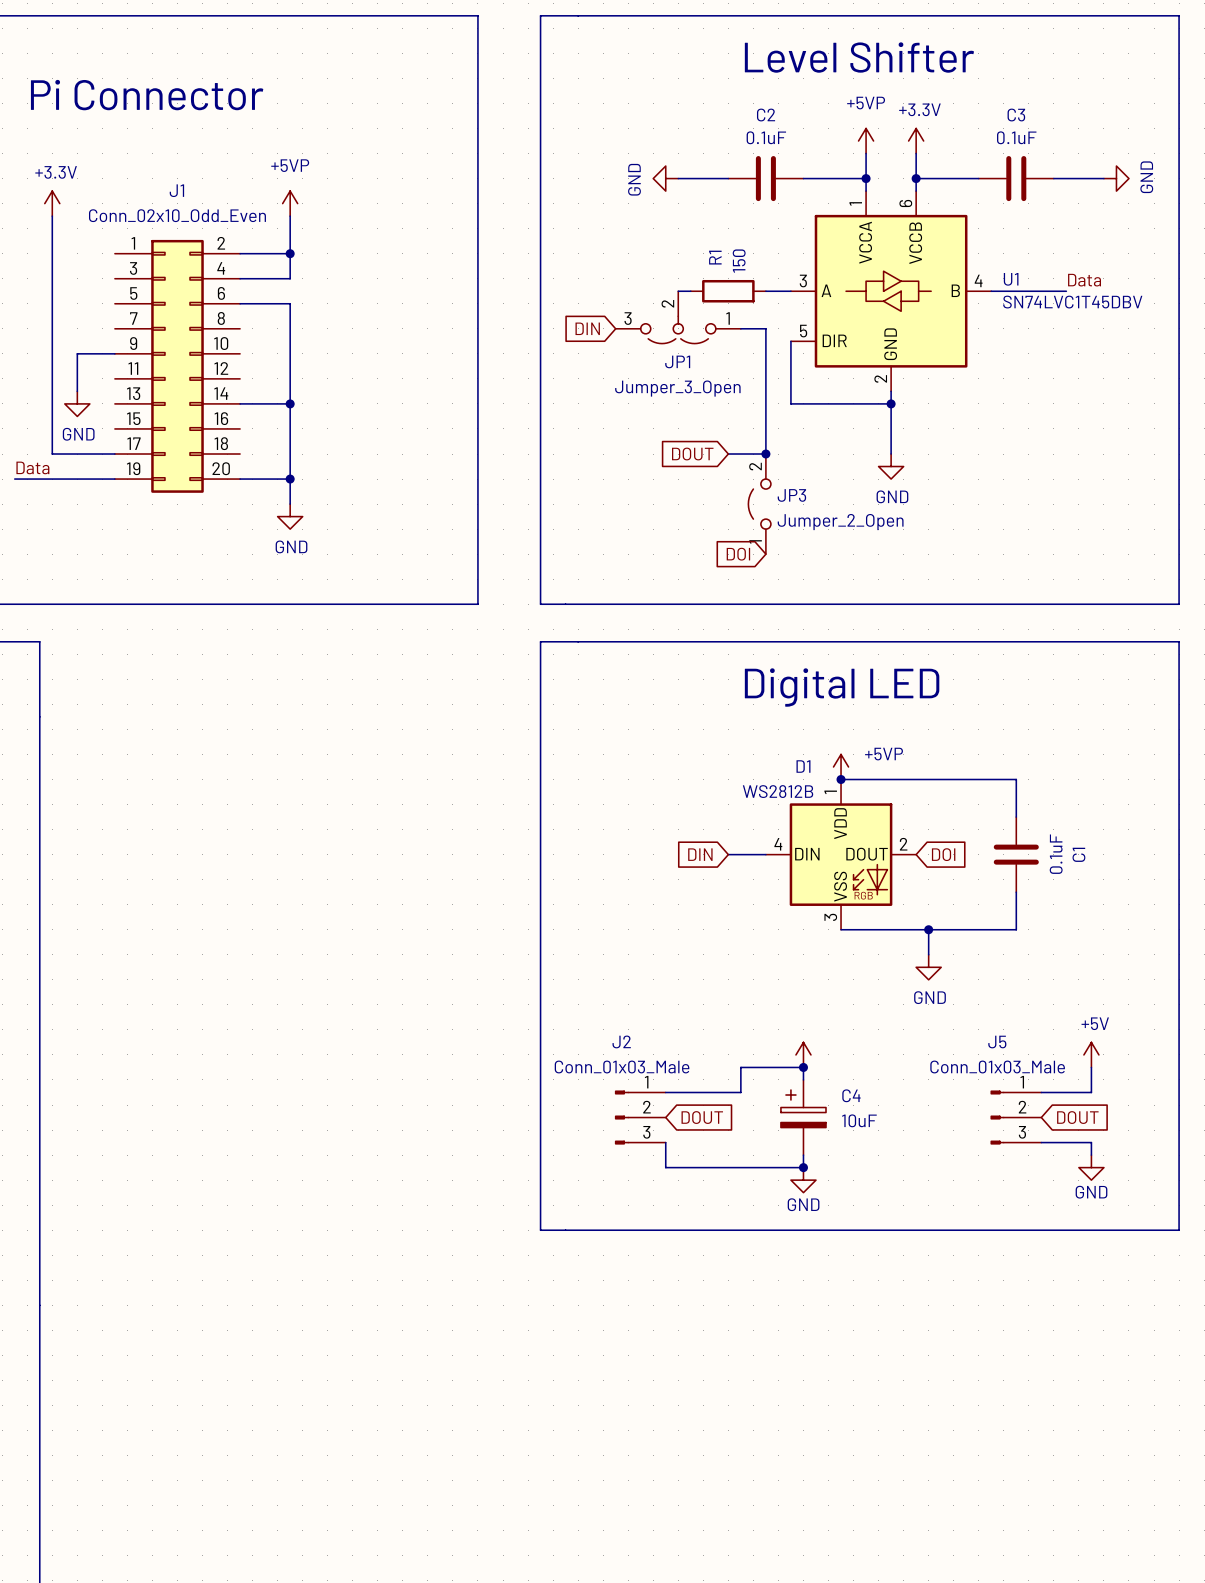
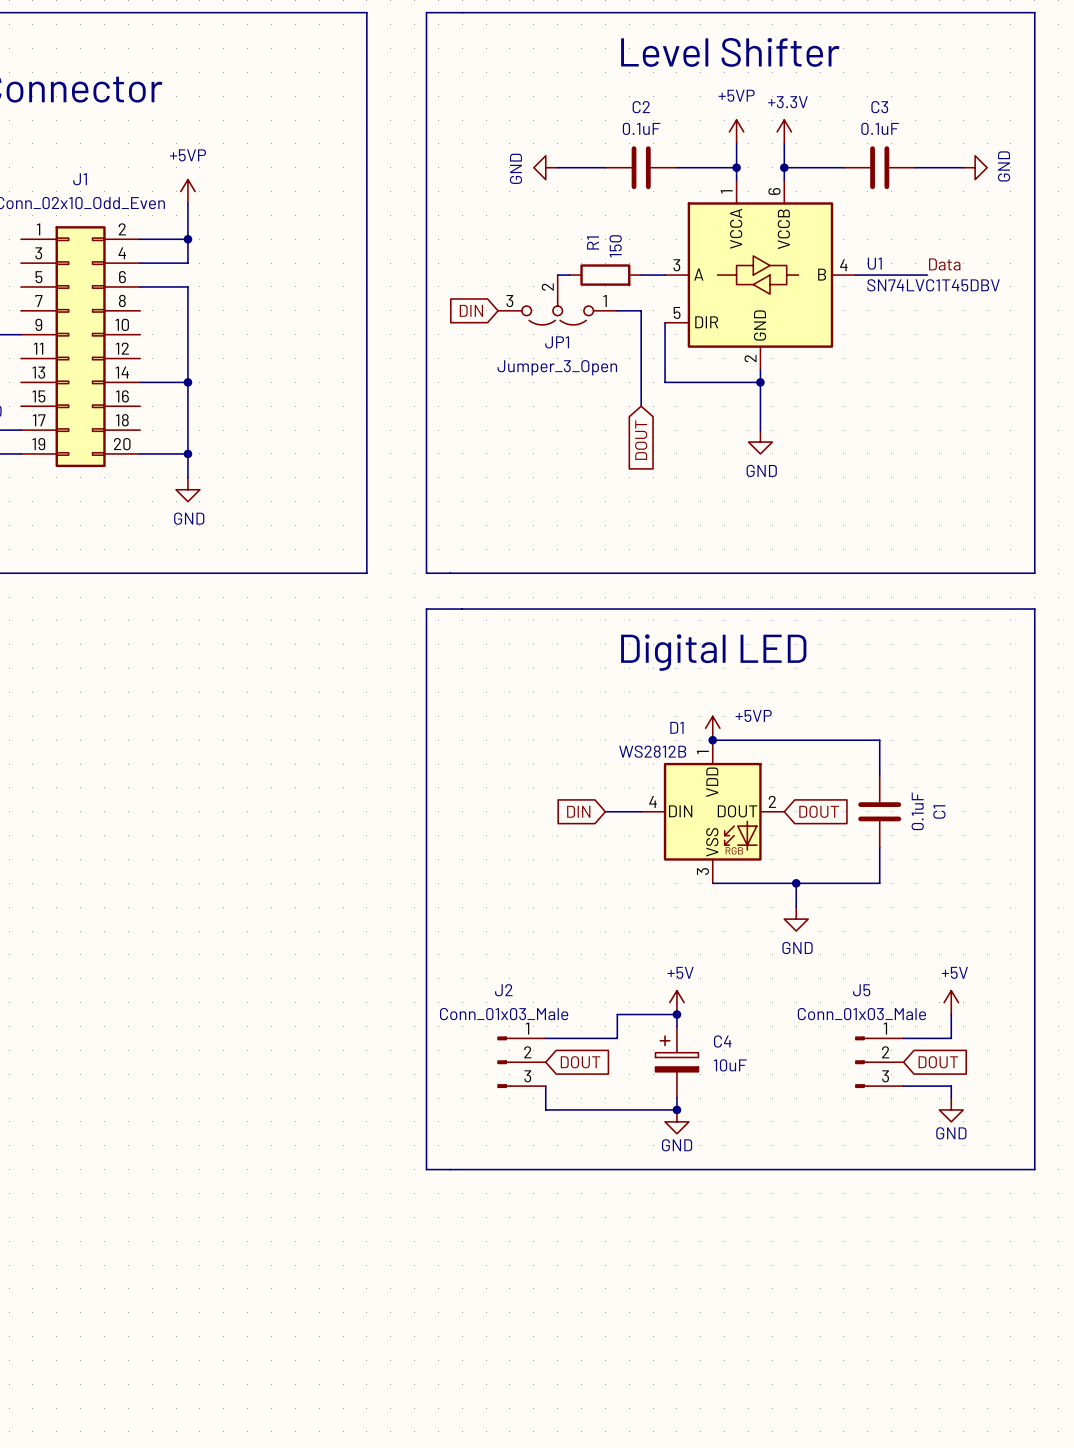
wire: (765, 428) (765, 454) (728, 454) -> none
global label rotation: 0° (692, 454) -> 90° counterclockwise (641, 440)
junction: (765, 454) -> none
JP3: Jumper_2_Open (759, 504) -> none
global label: DOI (738, 554) -> none
global label: DOI (943, 854) -> DOUT (819, 811)
power symbol text: none -> +5V (680, 972)

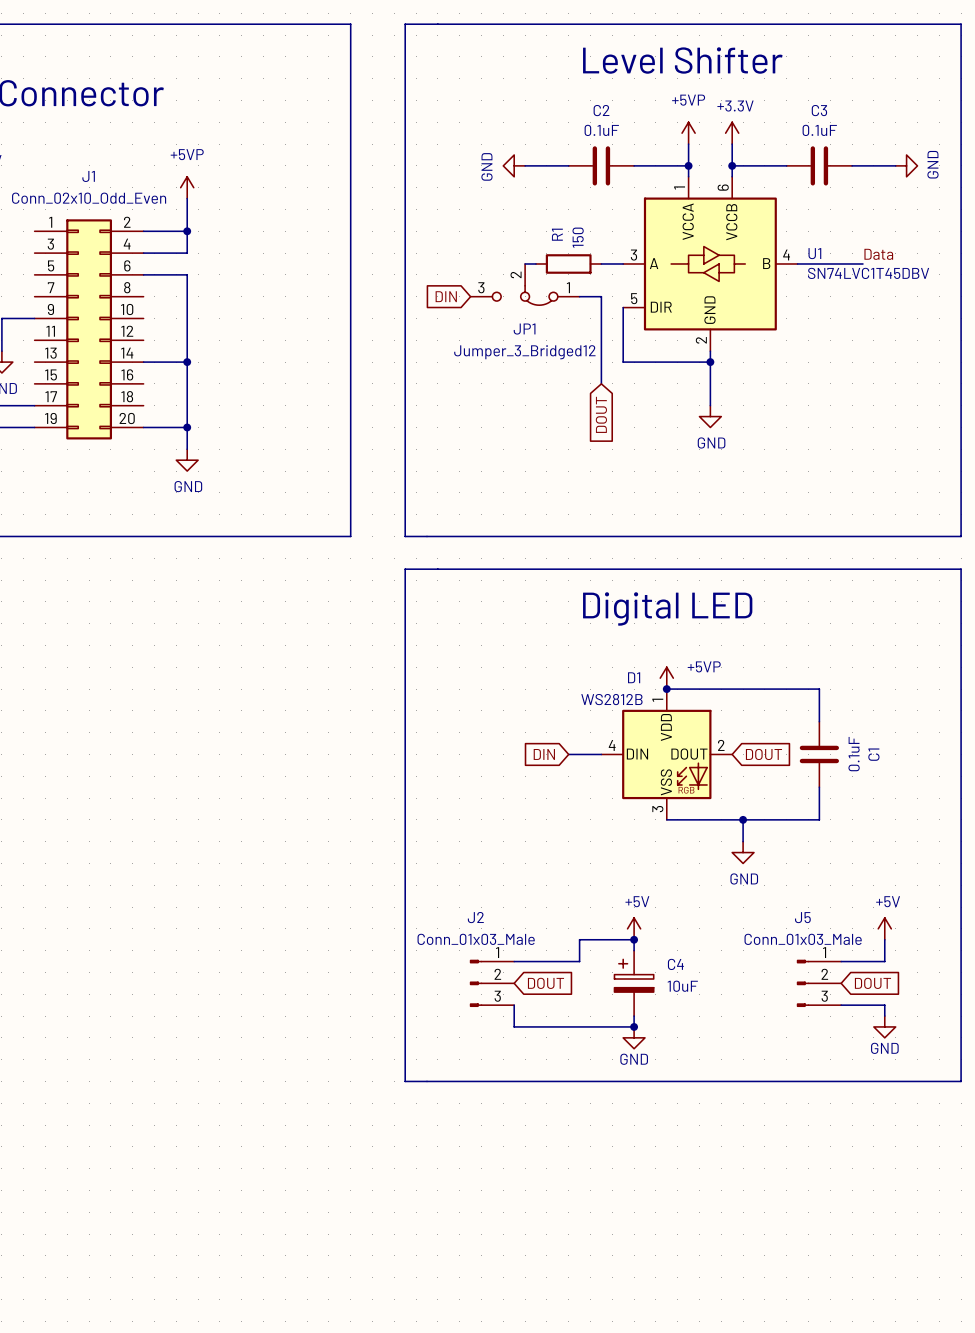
JP1 symbol: [498, 275, 618, 325] -> [470, 263, 580, 306]
JP1 value: Jumper_3_Open (557, 367) -> Jumper_3_Bridged12 (524, 352)

